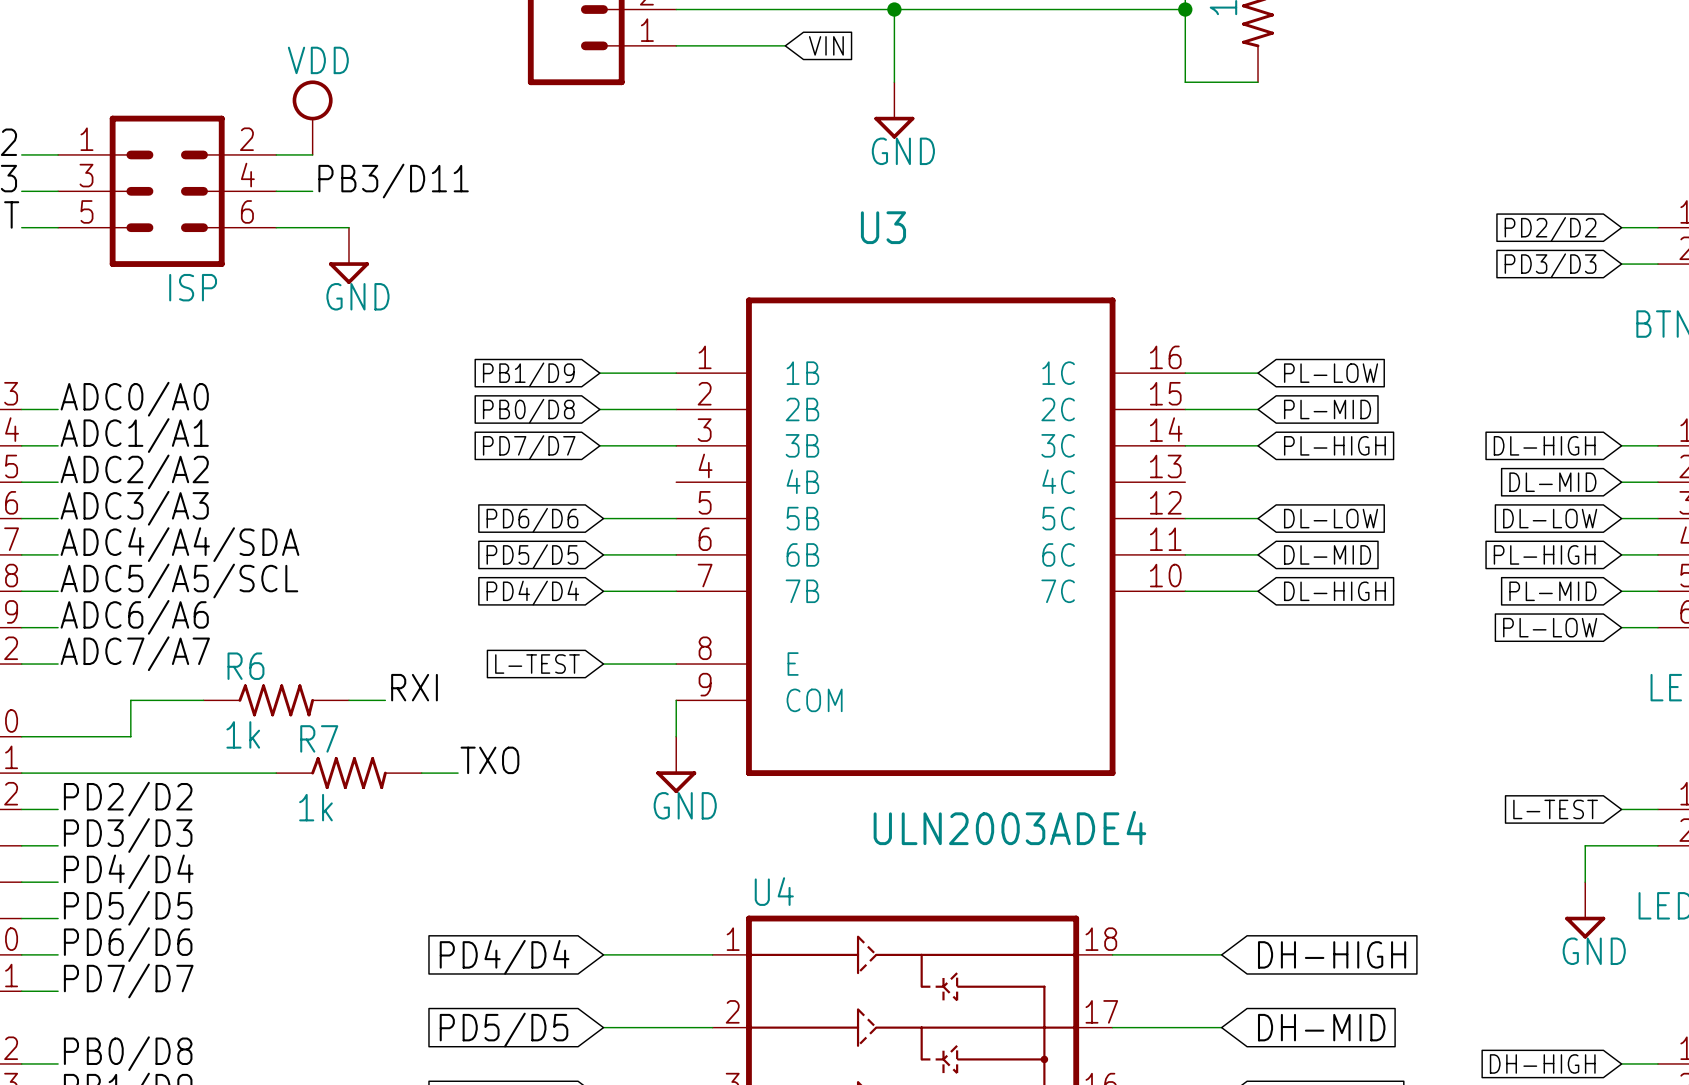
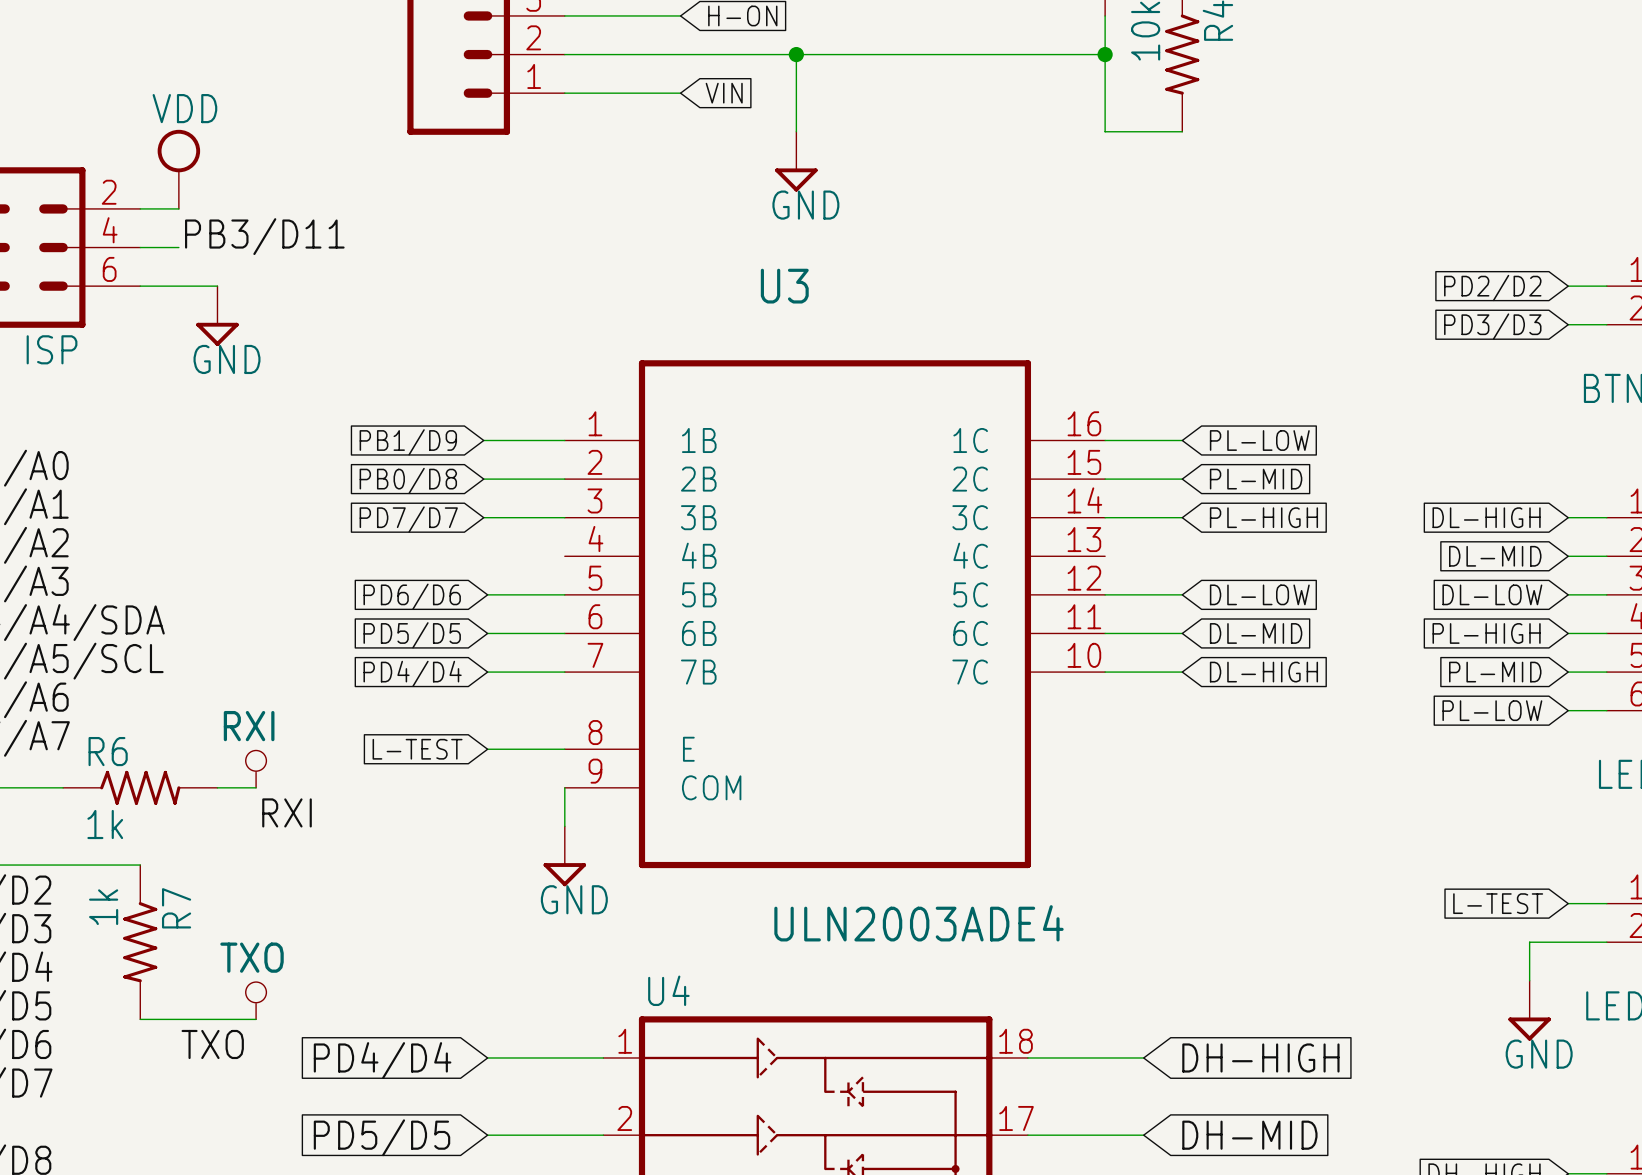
RXI: none -> (256, 769)
label position: RXI (414, 687) -> RXI (287, 812)
label position: TXO (489, 760) -> TXO (212, 1044)
R7 rotation: 0° (348, 773) -> 90° clockwise (140, 942)
R7 position: (348, 773) -> (140, 942)
wire: (421, 773) (458, 773) -> none
TXO: none -> (256, 1000)
wire: none -> (140, 1019) (256, 1019)

